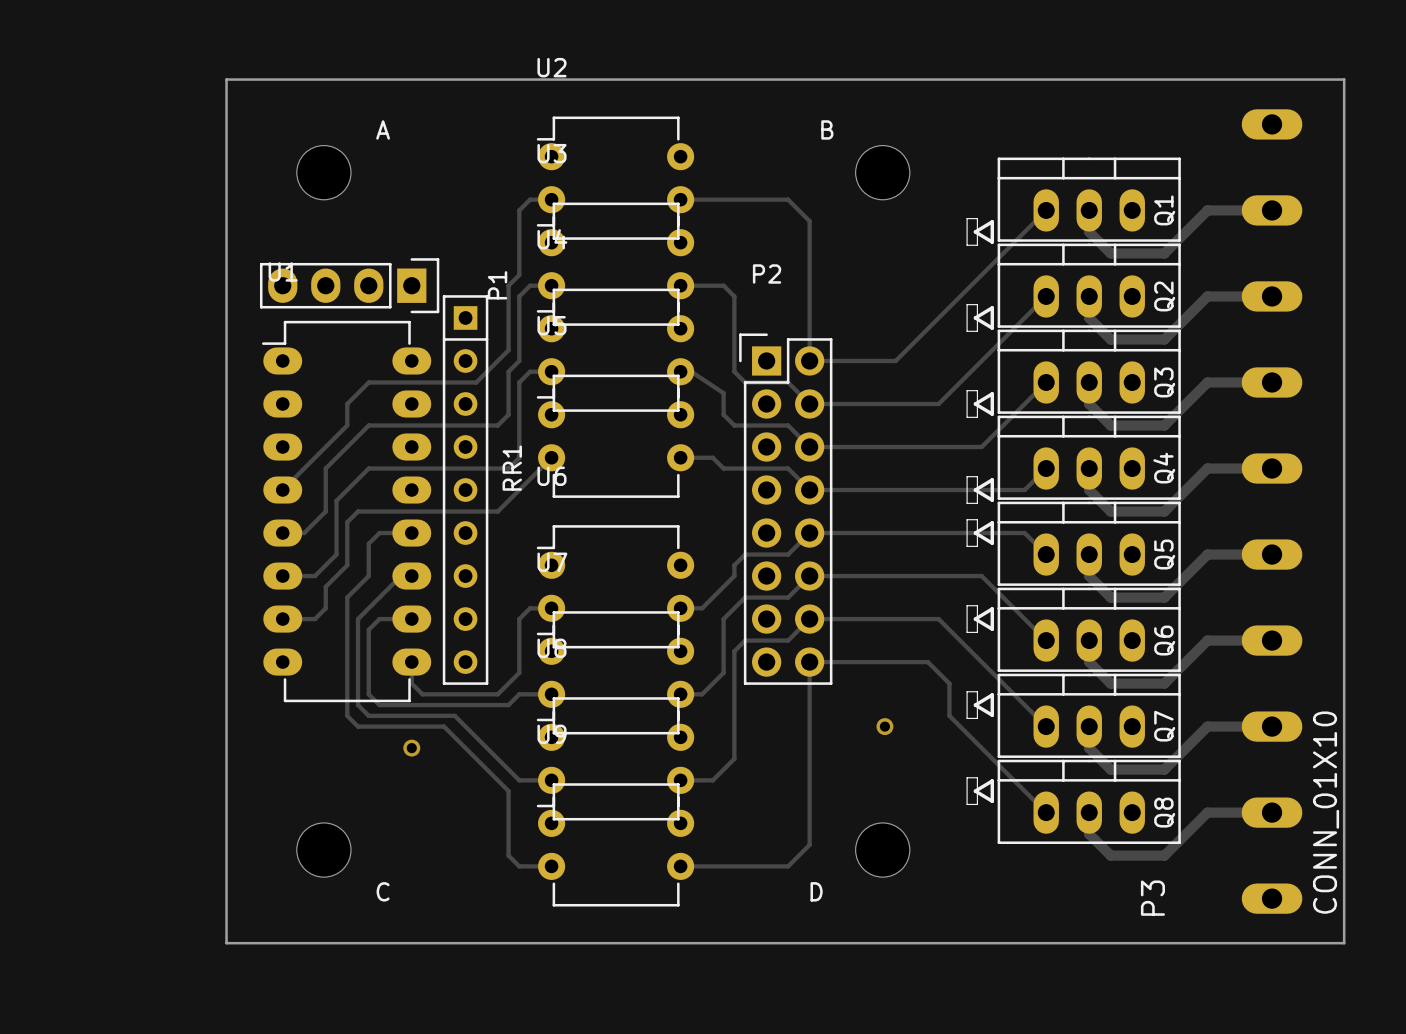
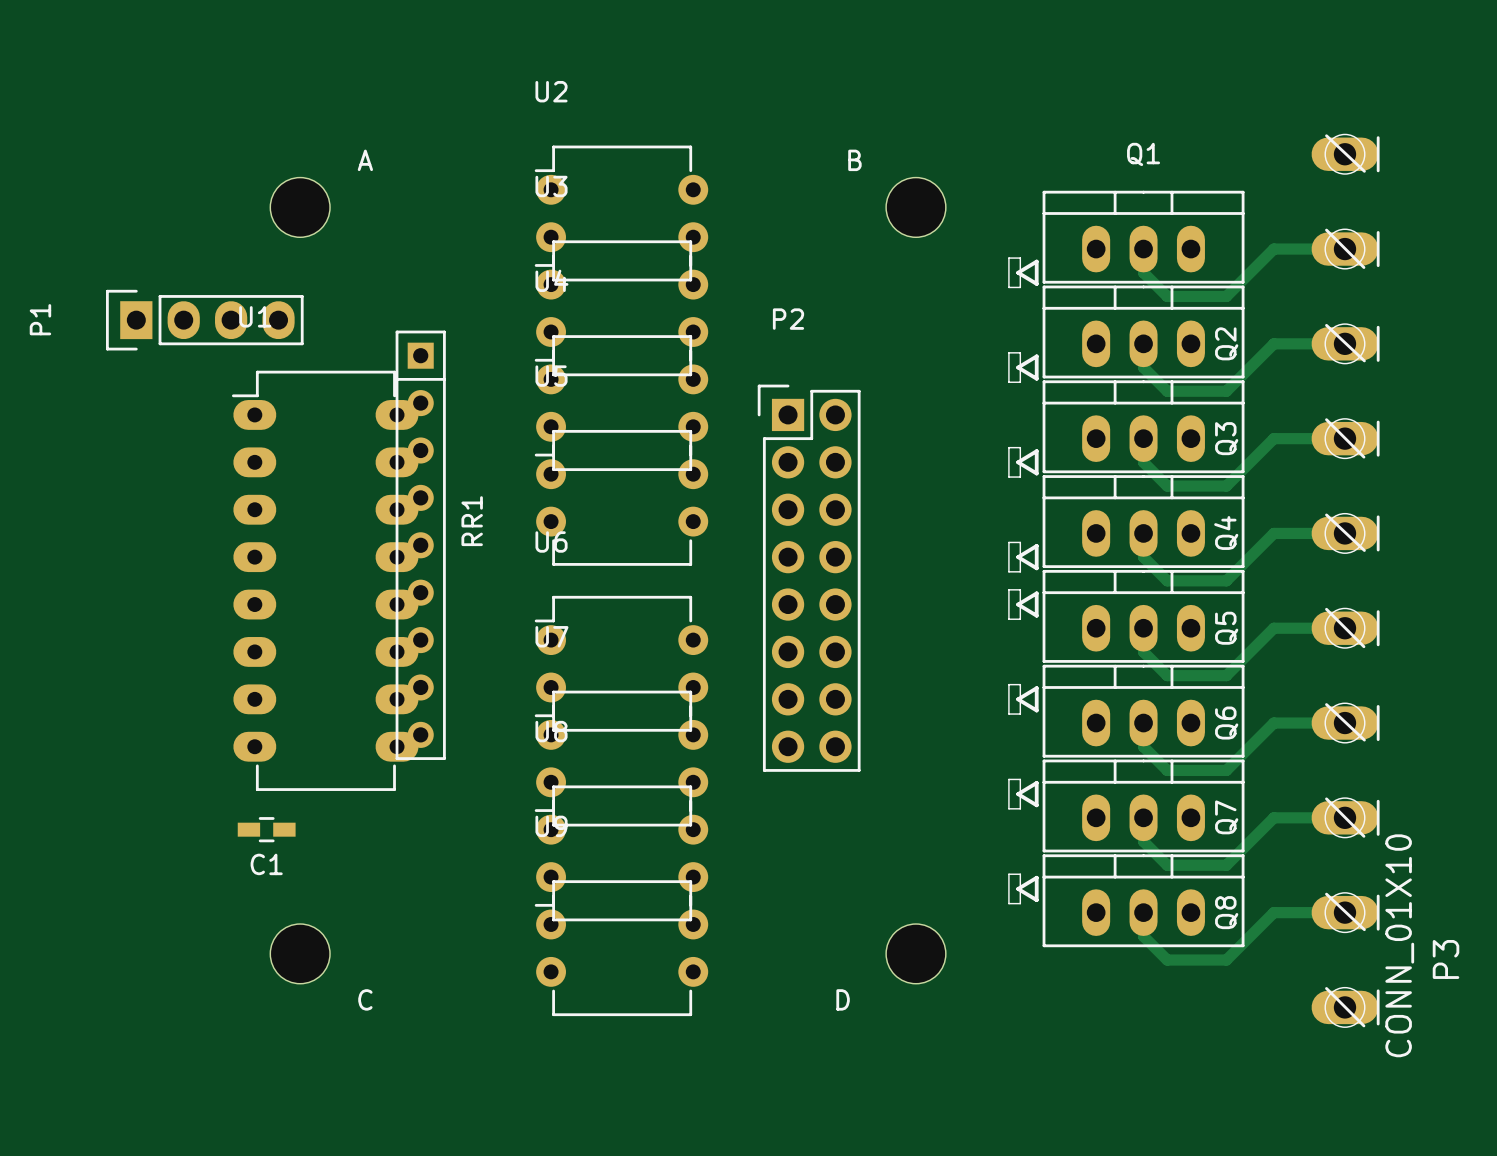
board edge: (226, 79) (226, 943) (1344, 943) (1344, 79) (226, 79) -> none
P3 footprint: [1241, 109, 1303, 914] -> [1311, 133, 1380, 1028]
track: (551, 199) (530, 199) (519, 210) (519, 274) (508, 285) (508, 350) (476, 382) (368, 382) (347, 403) (347, 425) (282, 490) -> none
track: (680, 199) (788, 199) (809, 221) (809, 360) (895, 360) (1046, 210) -> none
Q1 name rotation: 0° (1164, 210) -> 90° clockwise (1143, 154)
Q1 name position: Q1 (1164, 210) -> Q1 (1143, 154)
P1 rotation: 0° (349, 285) -> 180° (204, 320)
P1 position: (349, 285) -> (204, 320)
track: (551, 285) (530, 285) (519, 296) (519, 360) (508, 371) (508, 414) (497, 425) (368, 425) (325, 468) (325, 511) (304, 533) (282, 533) -> none
track: (680, 285) (723, 285) (734, 296) (734, 371) (745, 382) (788, 382) (809, 403) (938, 403) (1046, 296) -> none
track: (551, 371) (530, 371) (519, 382) (519, 457) (508, 468) (368, 468) (336, 500) (336, 554) (315, 576) (282, 576) -> none
track: (680, 371) (691, 371) (723, 393) (723, 414) (734, 425) (788, 425) (809, 447) (981, 447) (1046, 382) -> none
track: (551, 457) (497, 511) (358, 511) (347, 522) (347, 565) (325, 586) (325, 608) (315, 619) (282, 619) -> none
track: (680, 457) (712, 457) (723, 468) (788, 468) (809, 490) (1024, 490) (1046, 468) -> none
RR1 position: (465, 490) -> (420, 545)
track: (411, 533) (379, 533) (368, 543) (368, 576) (347, 597) (347, 715) (358, 726) (444, 726) (508, 791) (508, 855) (519, 866) (551, 866) -> none
track: (1046, 554) (1024, 533) (809, 533) (788, 554) (745, 554) (734, 565) (734, 576) (702, 608) (680, 608) -> none
track: (411, 576) (401, 576) (358, 619) (358, 705) (368, 715) (454, 715) (519, 780) (551, 780) -> none
track: (551, 608) (530, 608) (519, 619) (519, 672) (497, 694) (422, 694) (411, 683) (411, 662) -> none
track: (411, 619) (379, 619) (368, 629) (368, 694) (379, 705) (508, 705) (519, 694) (551, 694) -> none
track: (1046, 640) (981, 576) (809, 576) (788, 597) (745, 597) (723, 619) (723, 672) (702, 694) (680, 694) -> none
via: (884, 726) -> none
track: (1046, 726) (938, 619) (809, 619) (788, 640) (745, 640) (734, 651) (734, 758) (712, 780) (680, 780) -> none
C1: none -> (266, 829)
via: (411, 748) -> none
track: (1046, 812) (949, 715) (949, 683) (927, 662) (809, 662) (809, 844) (788, 866) (680, 866) -> none
P3 name position: P3 (1152, 898) -> P3 (1446, 959)

